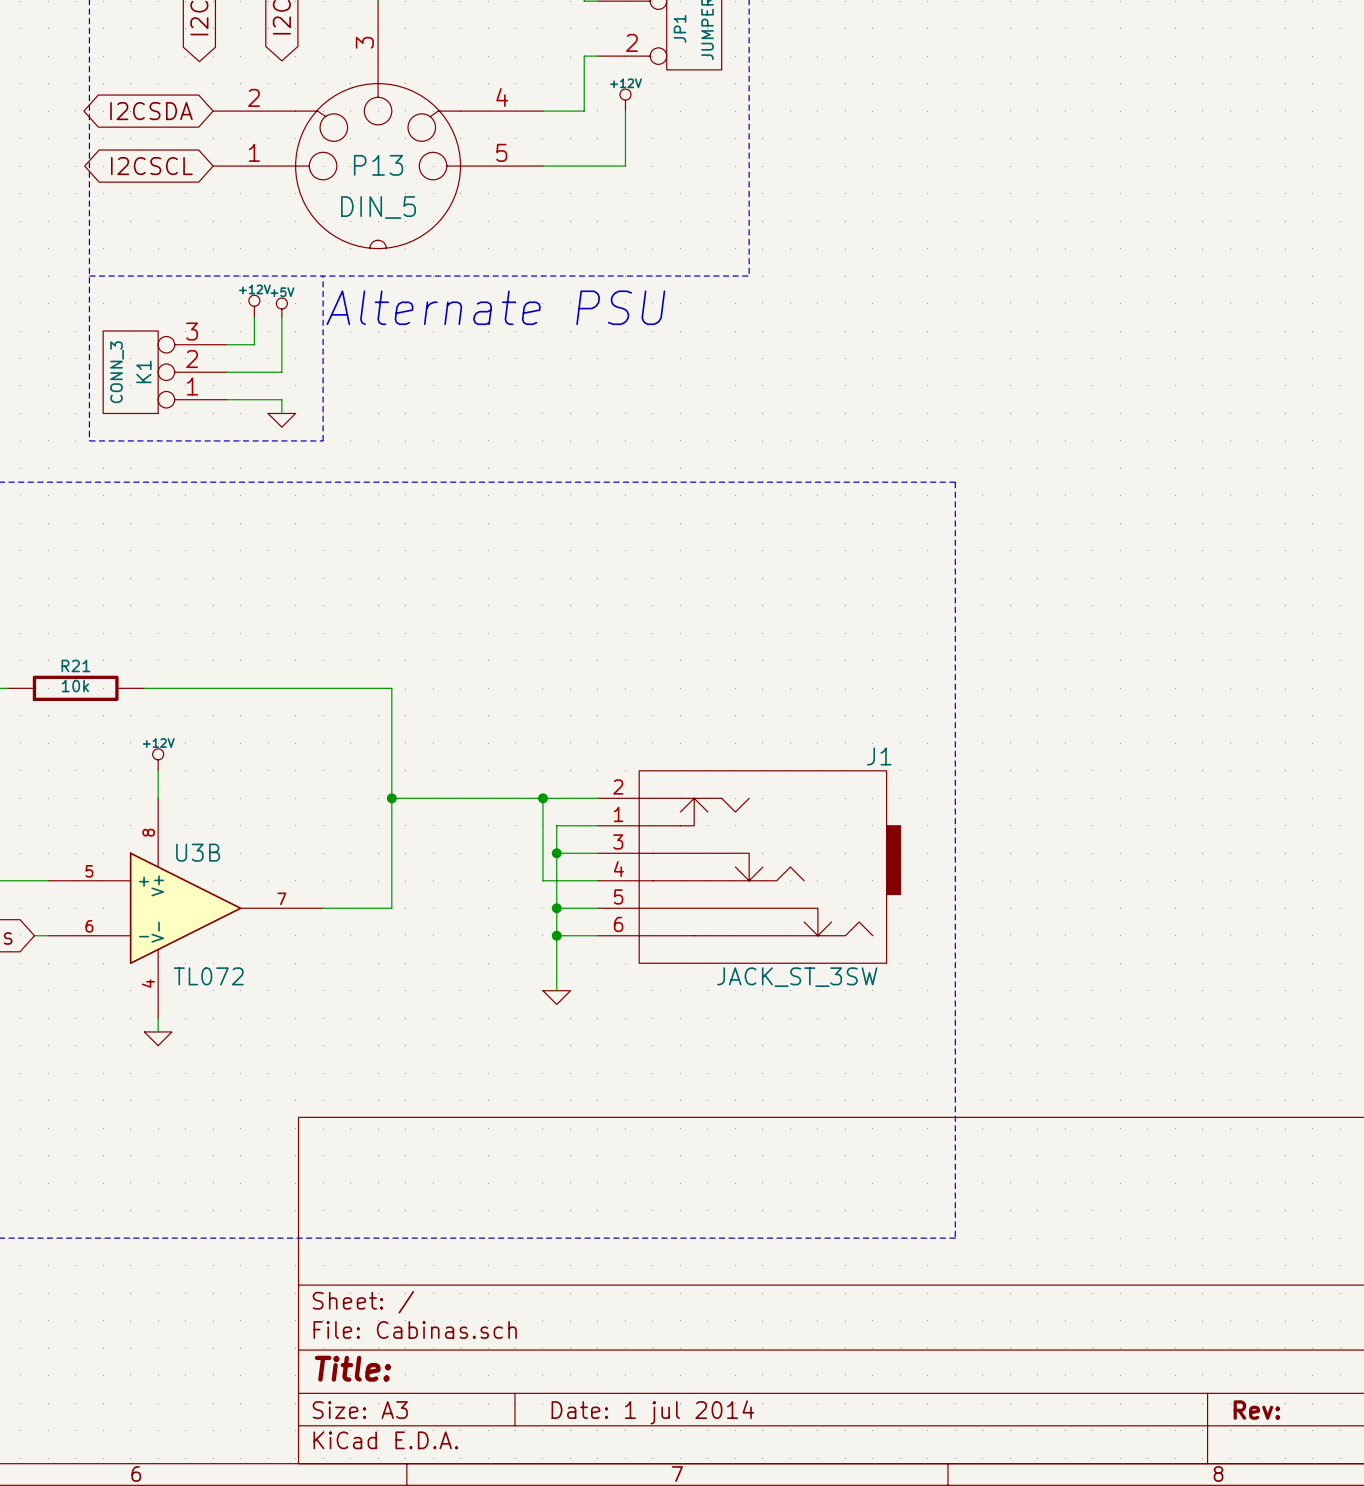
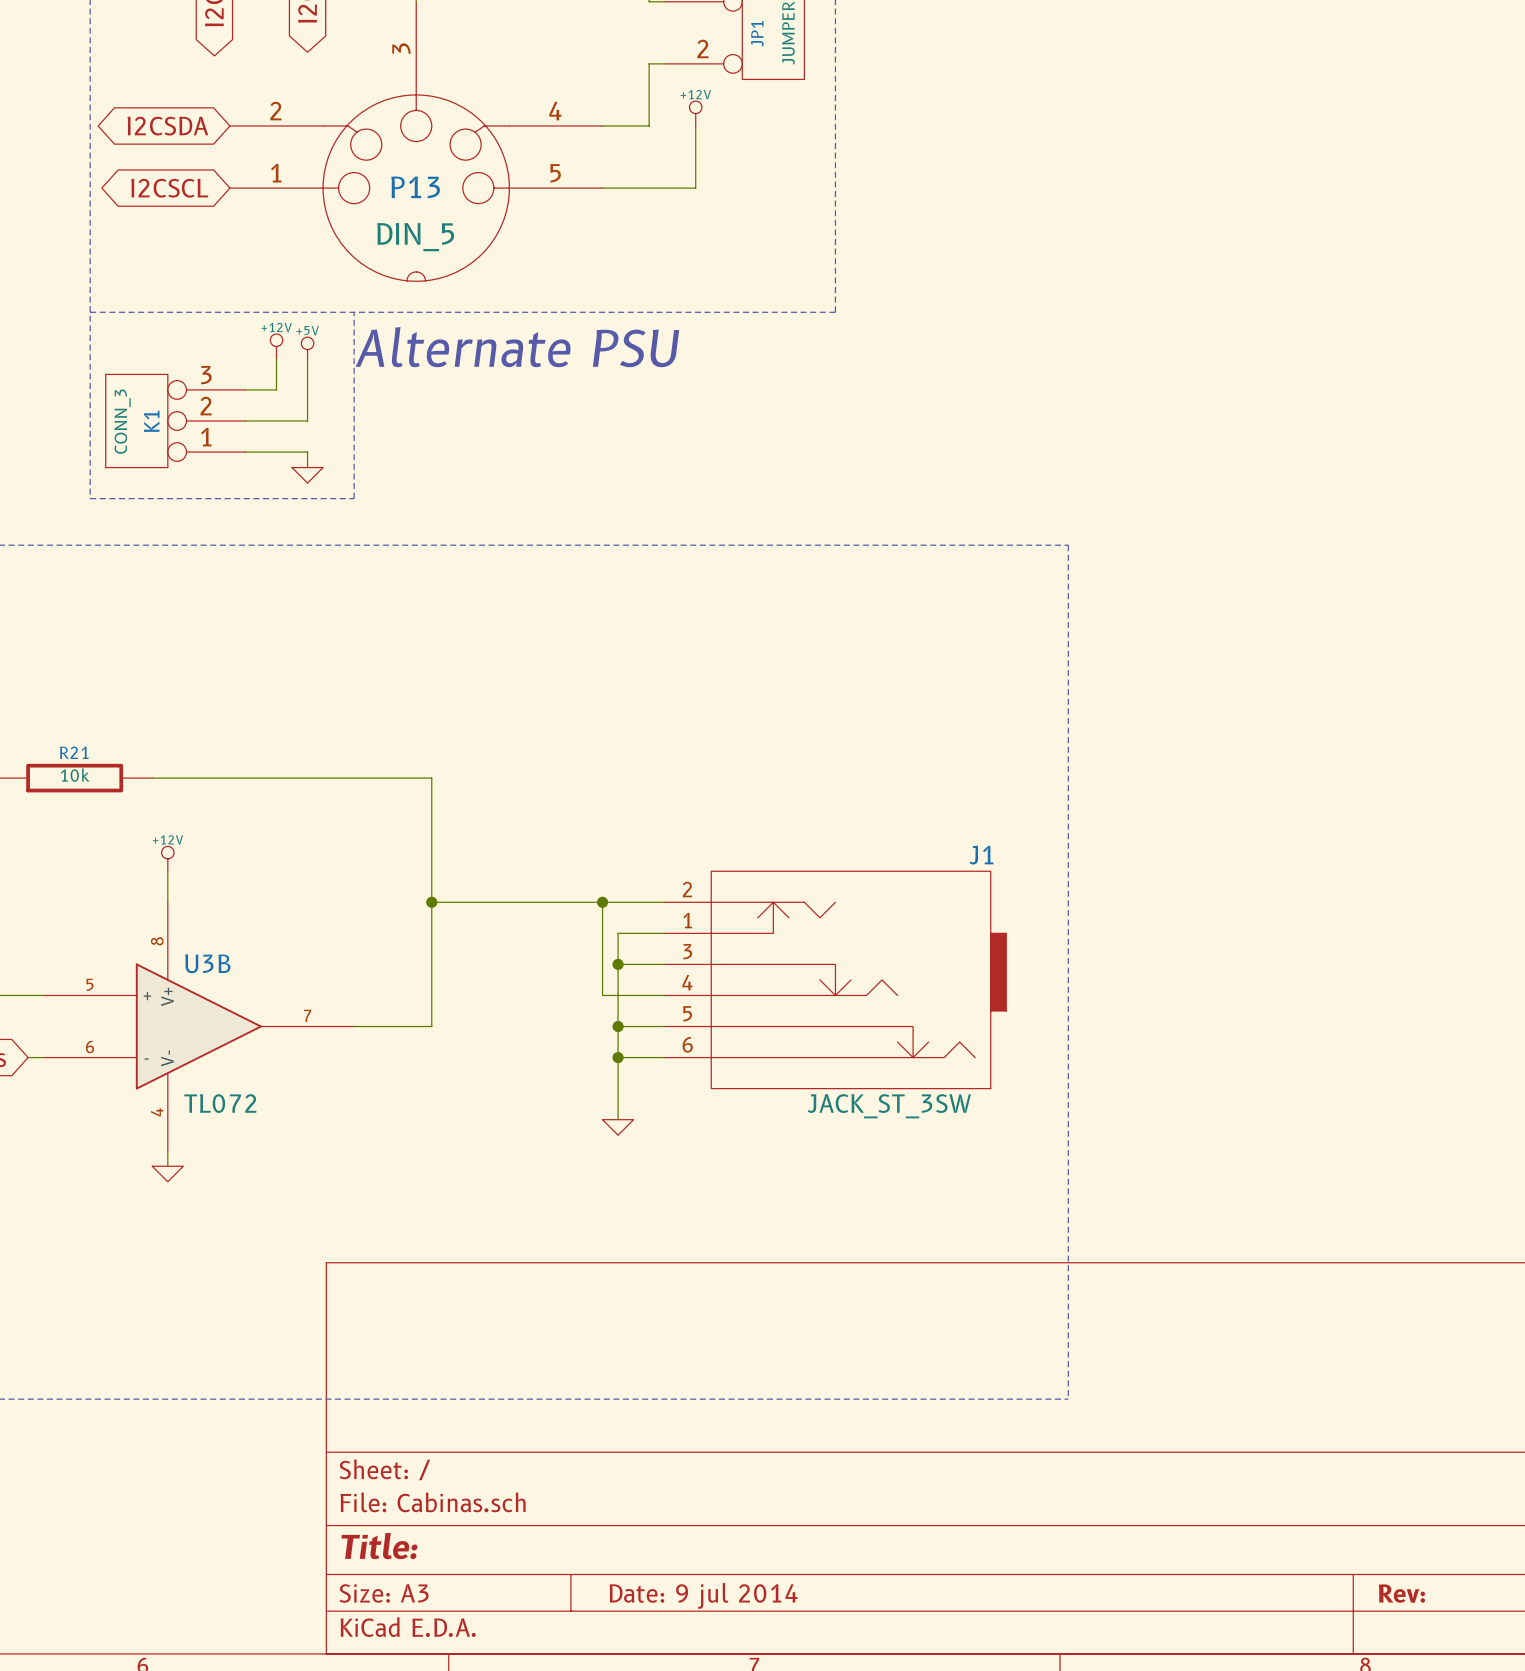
title block: Date: 1 jul 2014 (652, 1412) -> Date: 9 jul 2014 (703, 1595)

